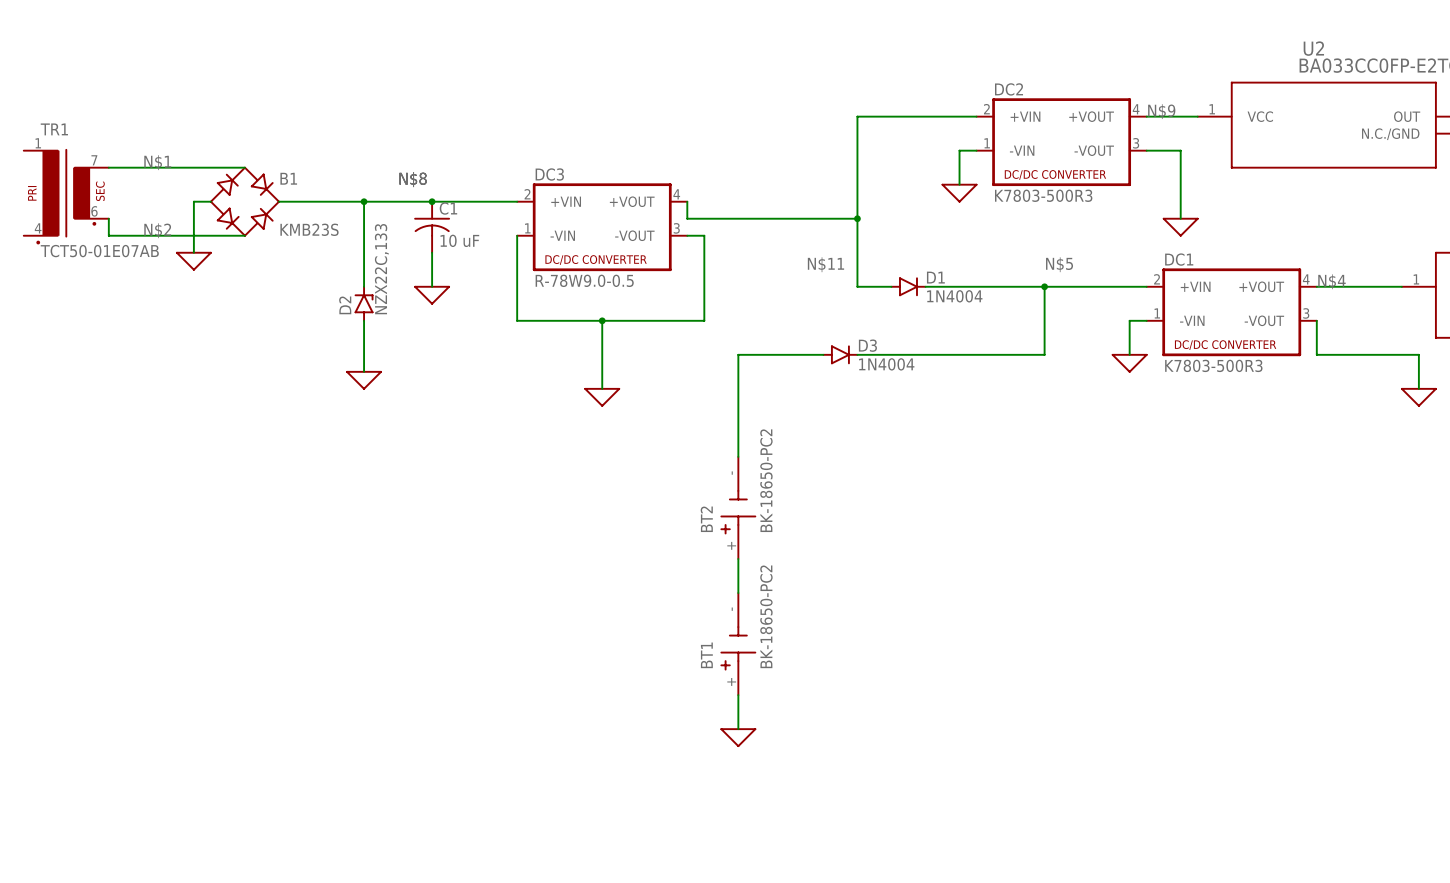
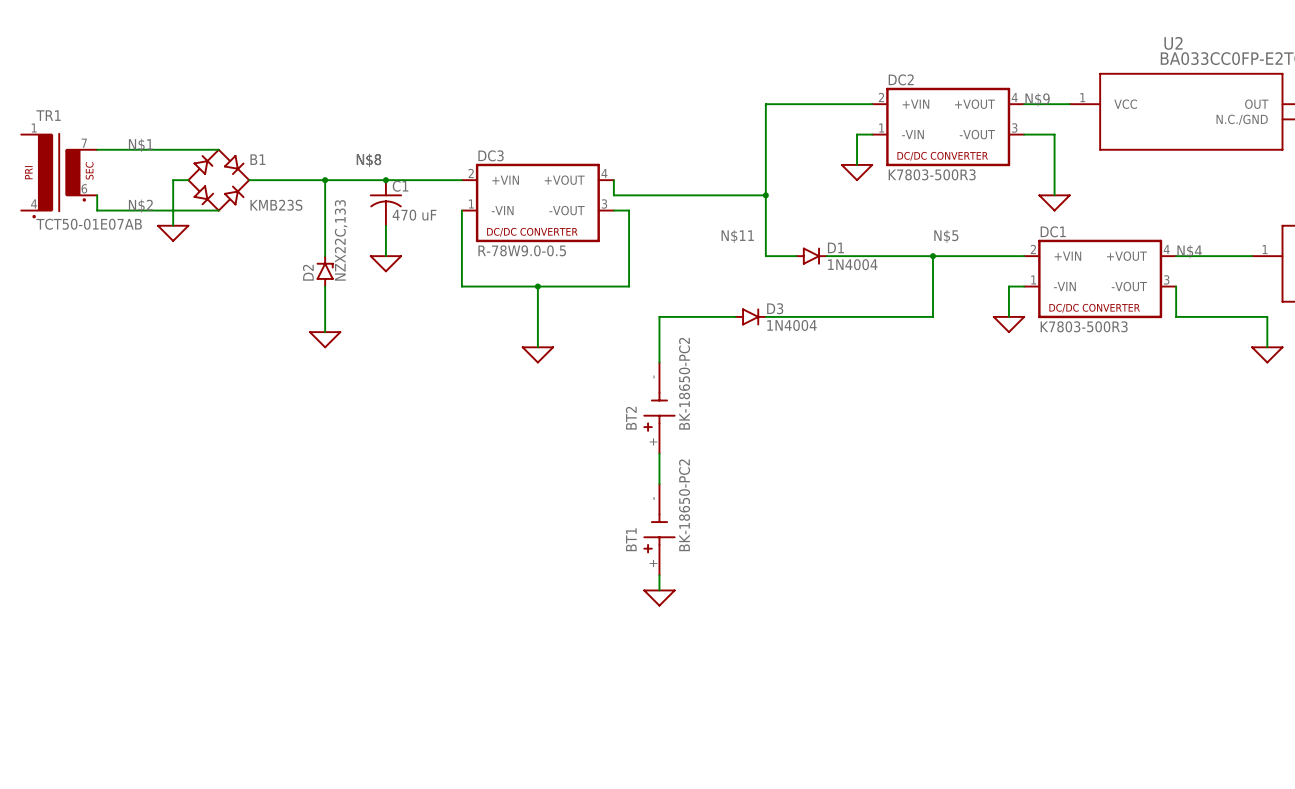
C1 value: 10 uF (459, 240) -> 470 uF (414, 215)
BT2 position: (738, 507) -> (659, 408)
BT1 position: (738, 644) -> (659, 529)
wire: (738, 695) (738, 729) -> none
power symbol position: (738, 737) -> (659, 598)

